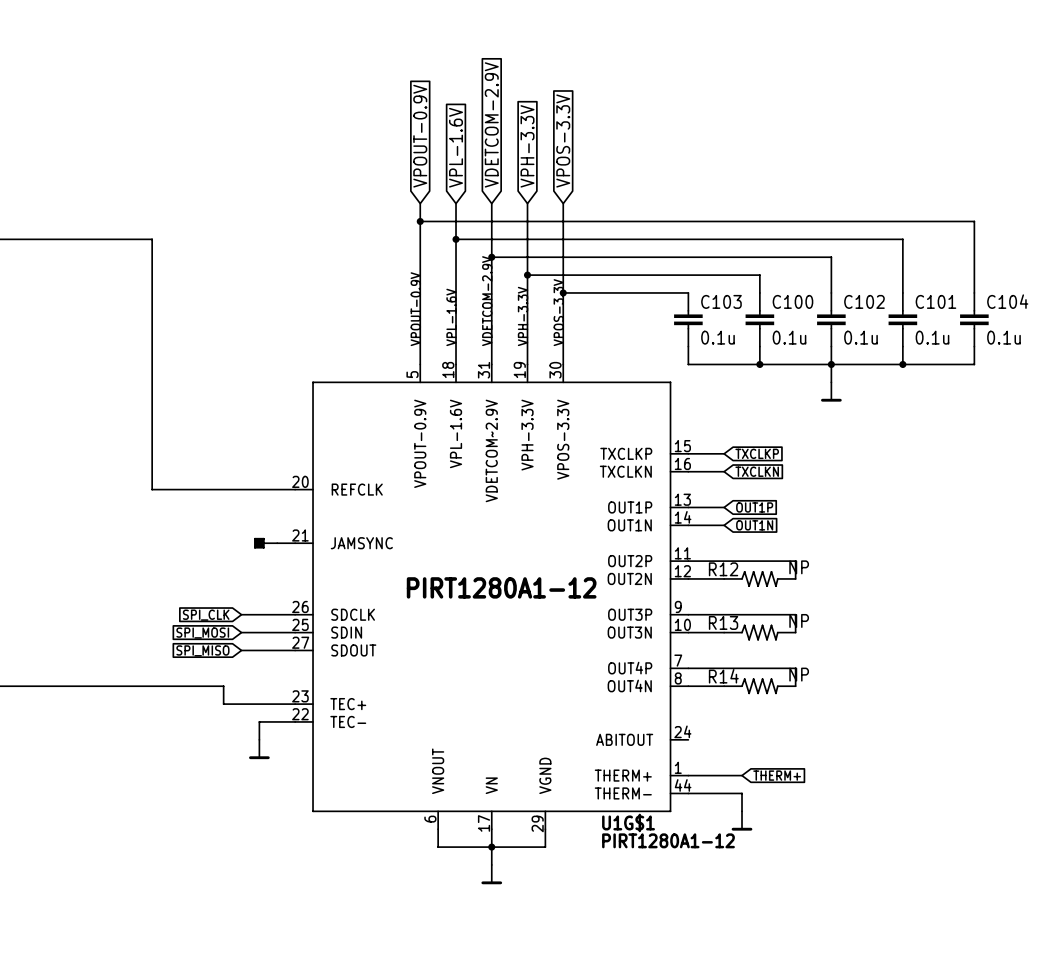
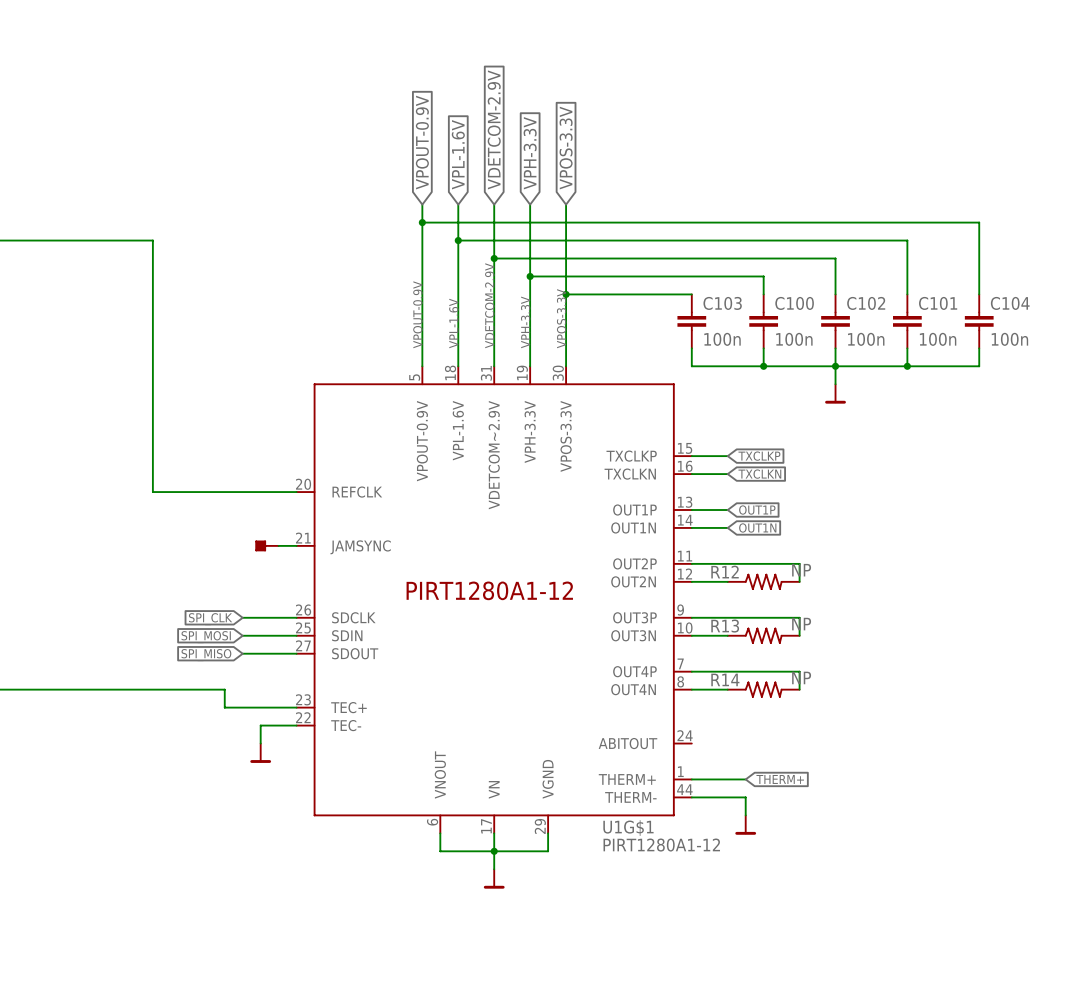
C103 value: 0.1u (717, 337) -> 100n (722, 339)
C100 value: 0.1u (789, 337) -> 100n (794, 339)
C102 value: 0.1u (860, 337) -> 100n (866, 339)
C101 value: 0.1u (932, 337) -> 100n (938, 339)
C104 value: 0.1u (1003, 337) -> 100n (1009, 339)

